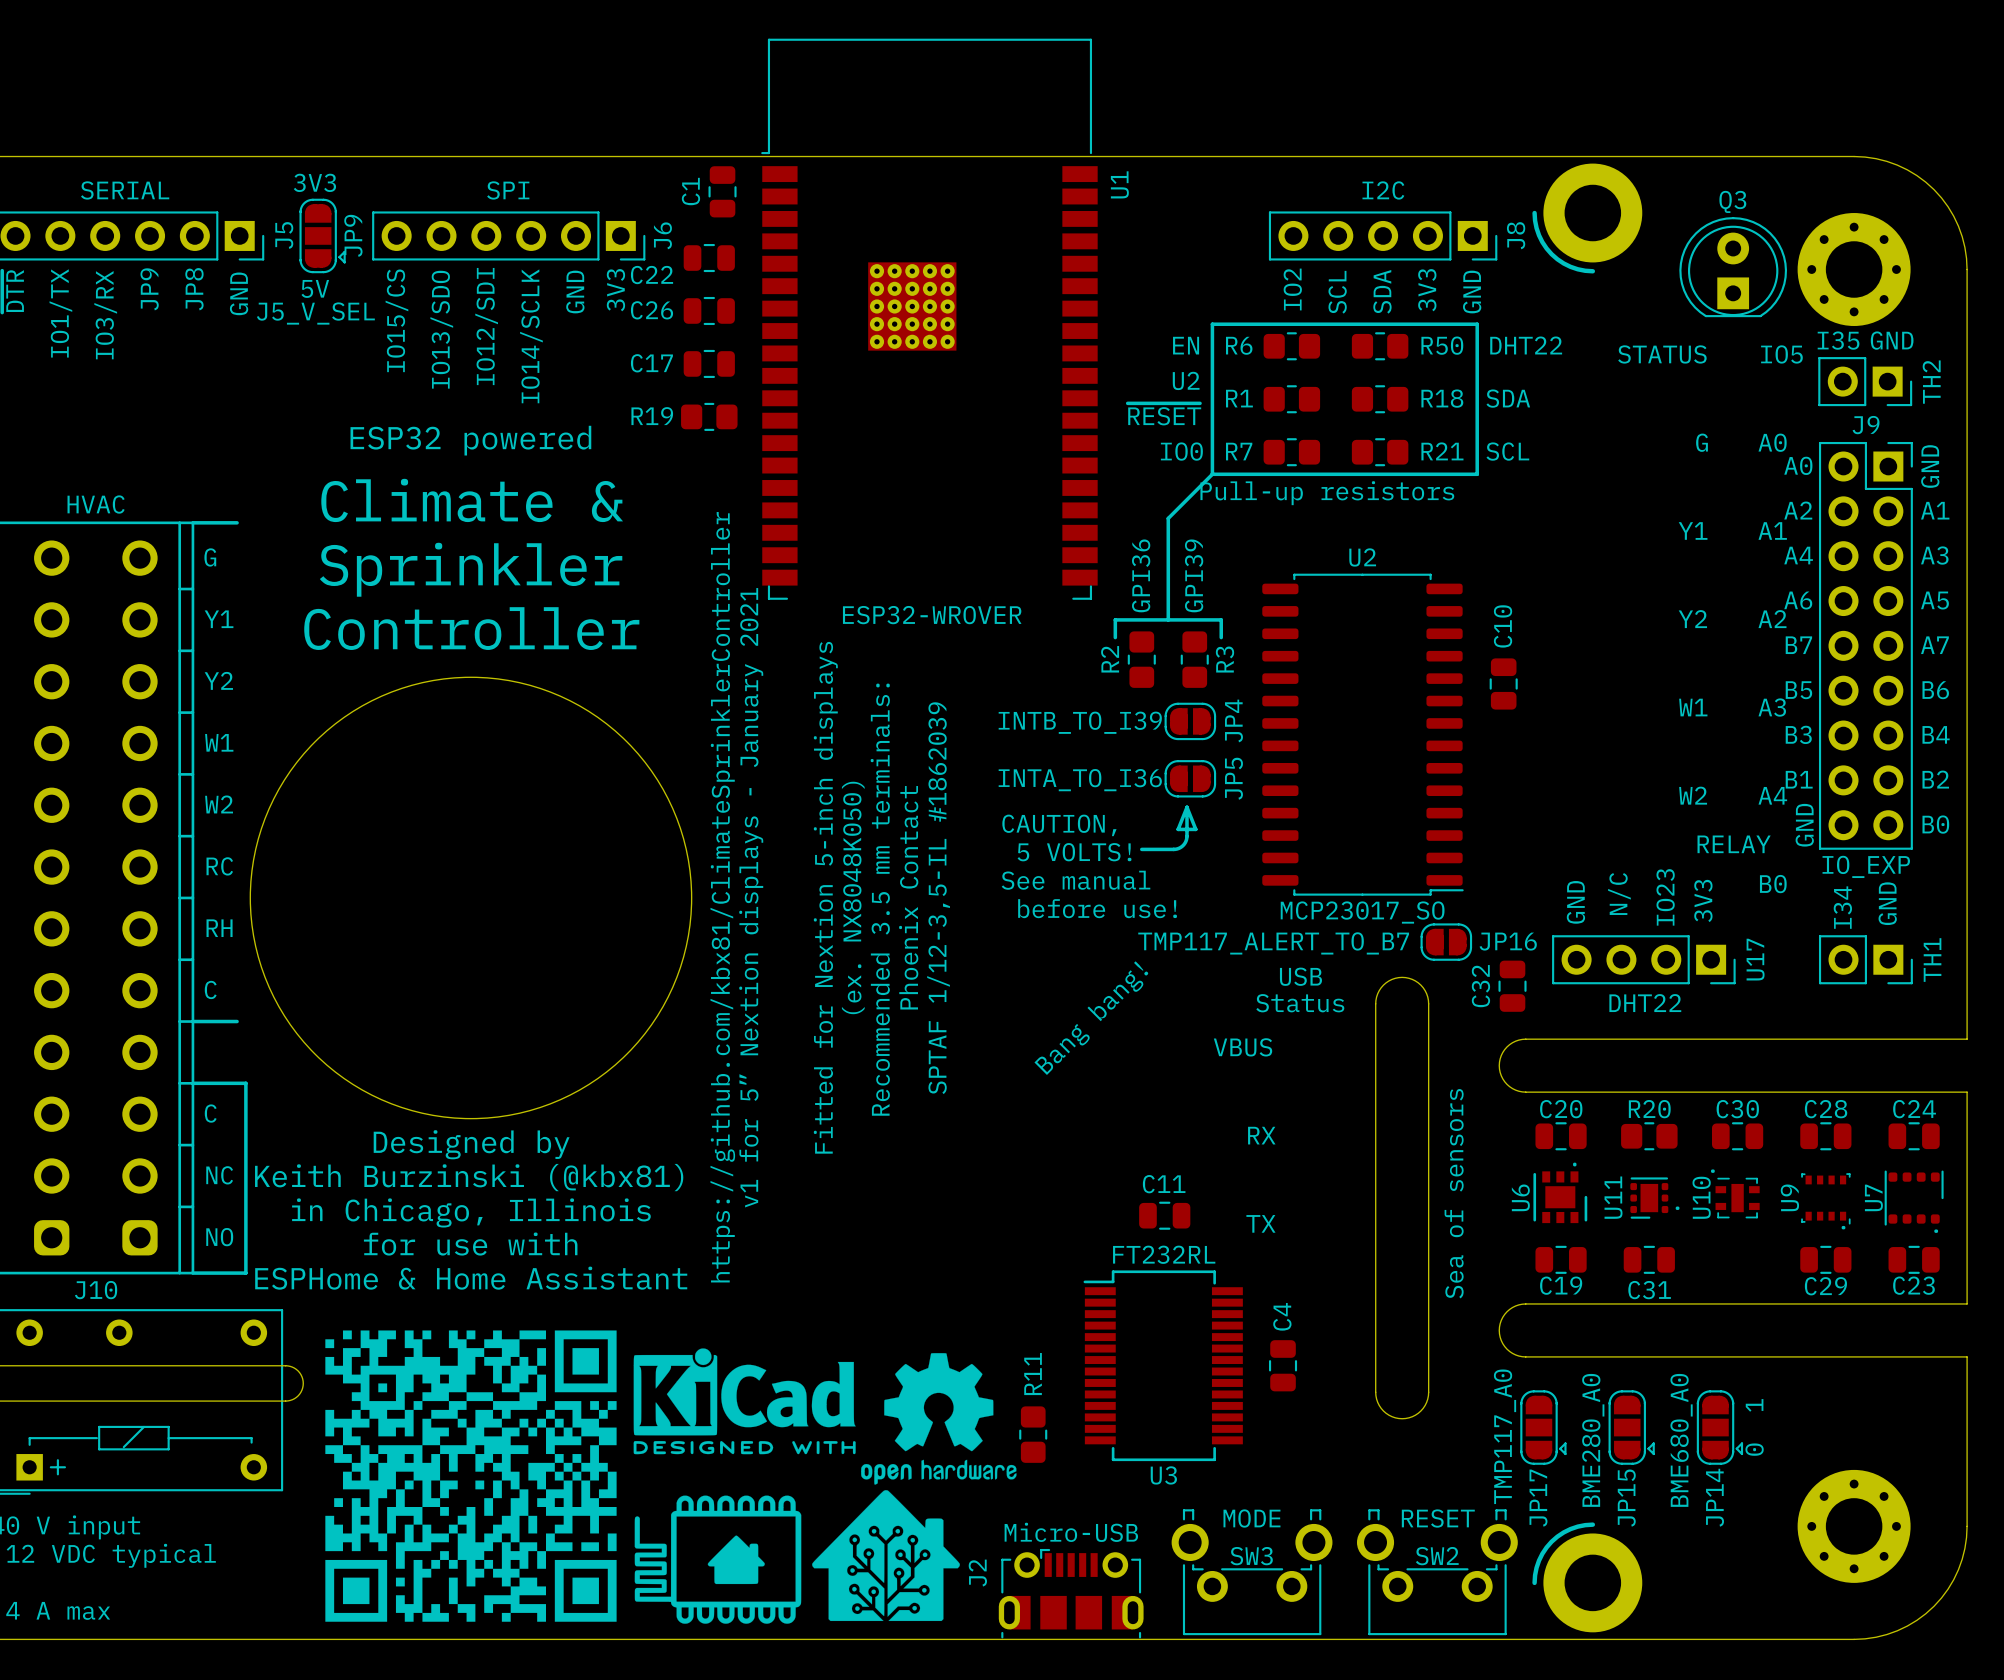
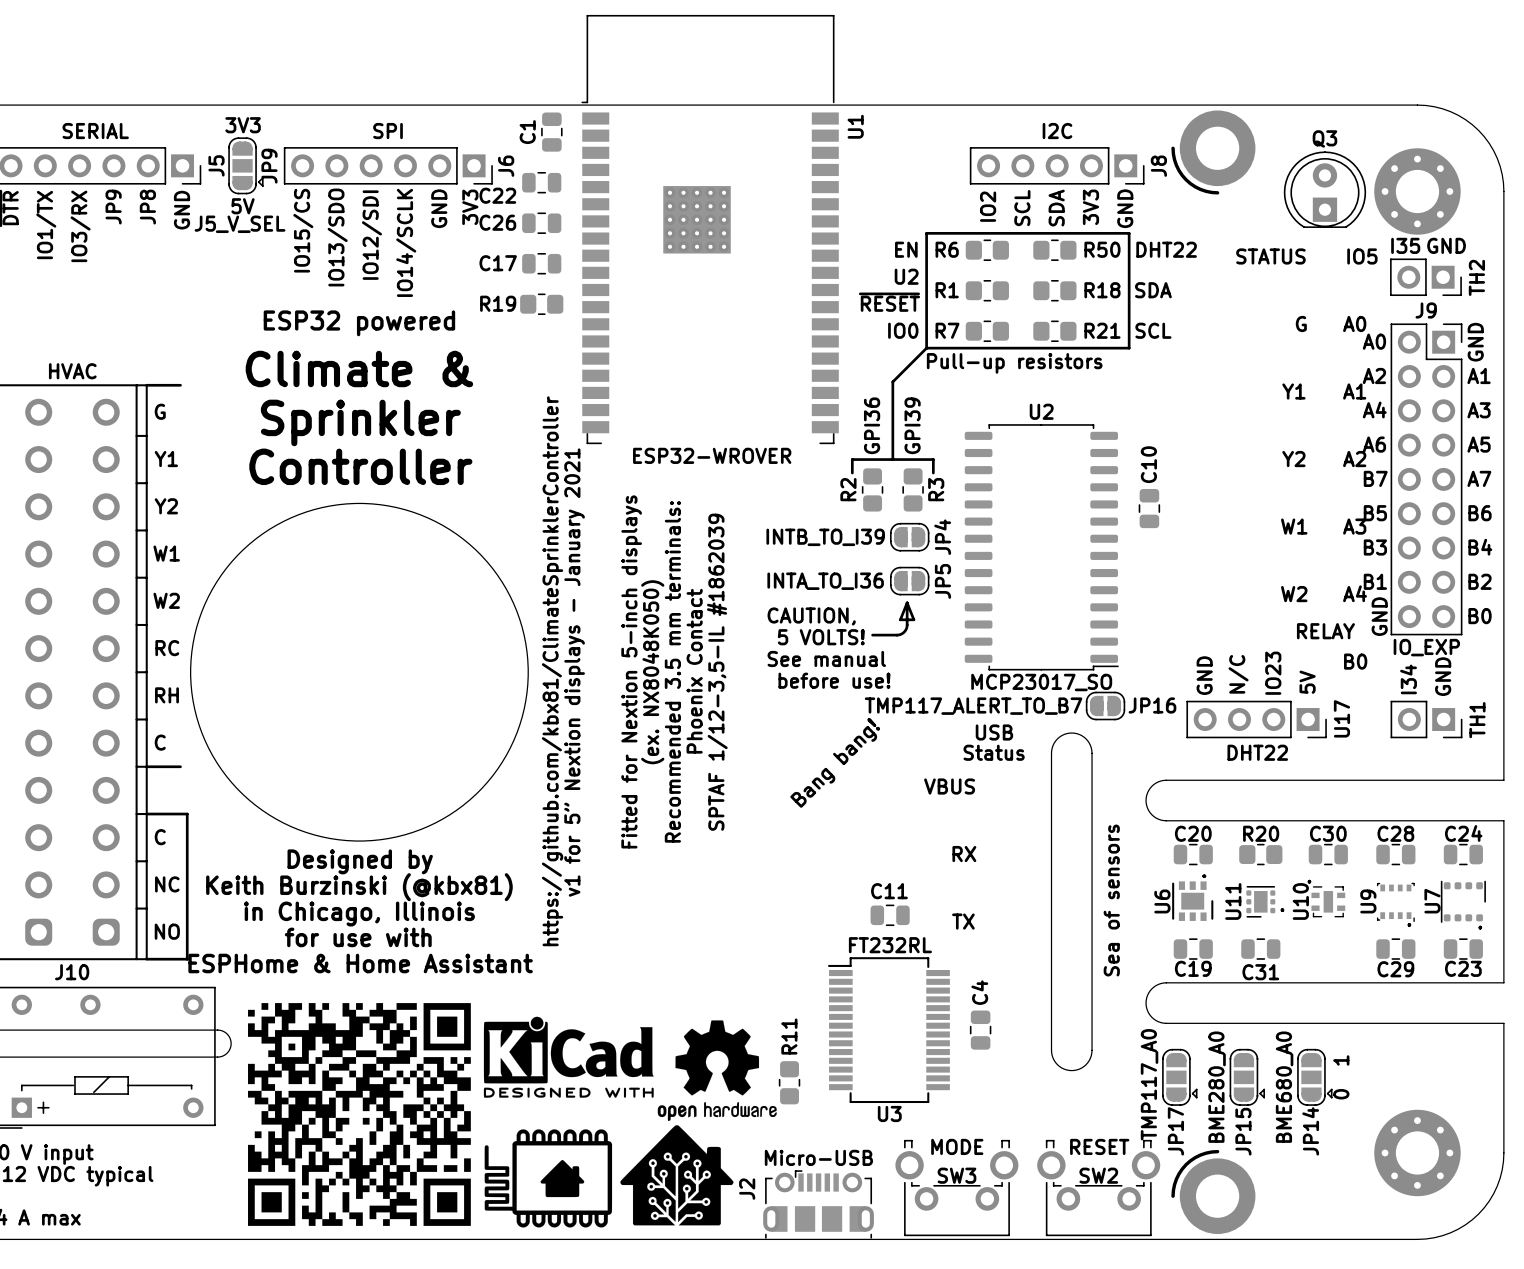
U17 text: 3V3 (1703, 900) -> none
U17 text: none -> 5V (1307, 682)
C32: (1512, 986) -> none

